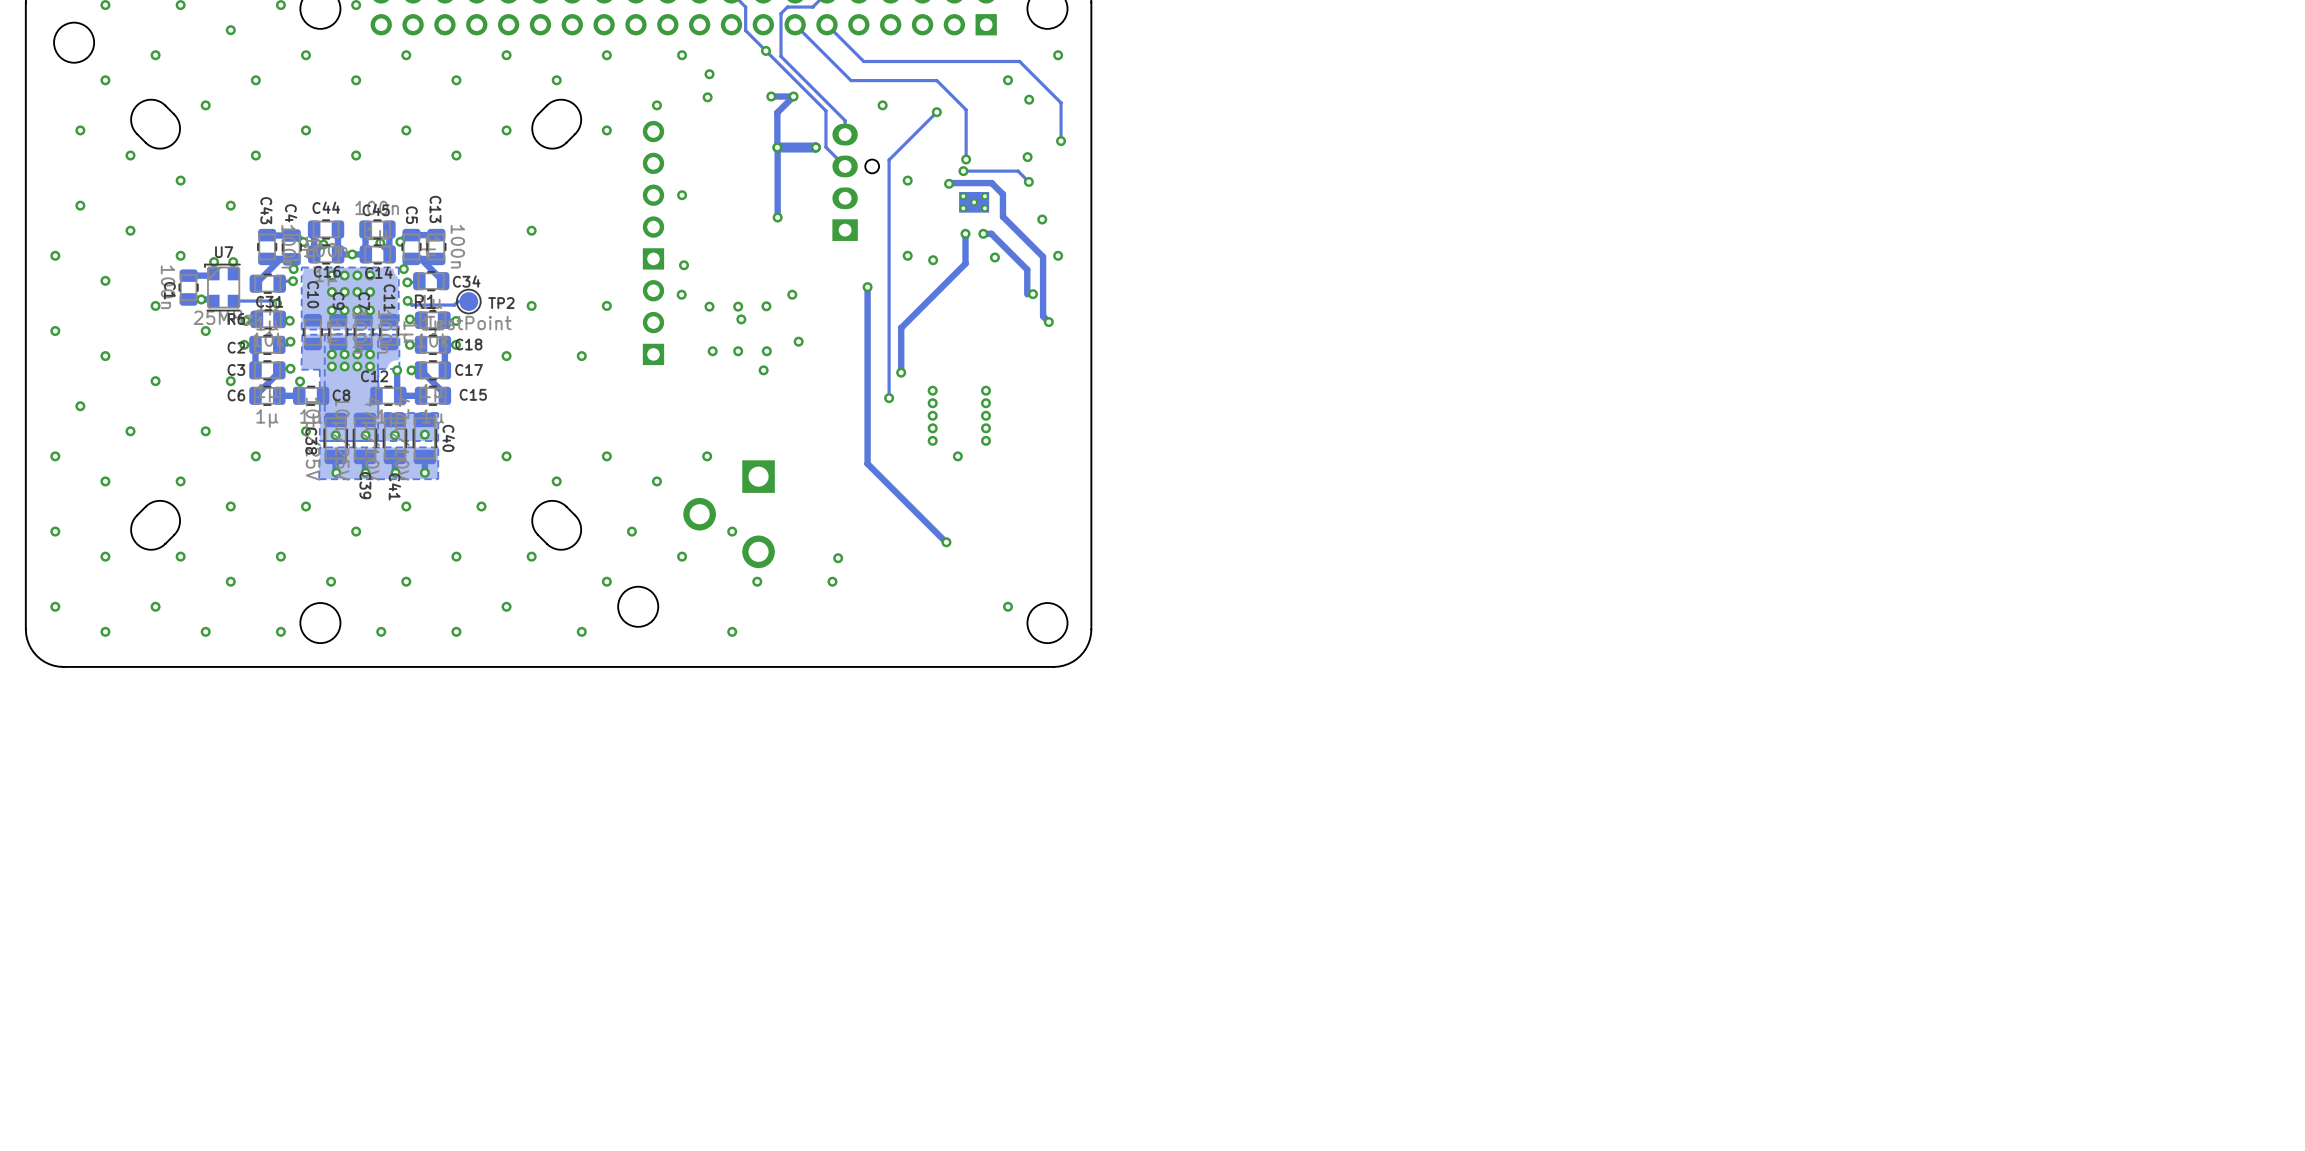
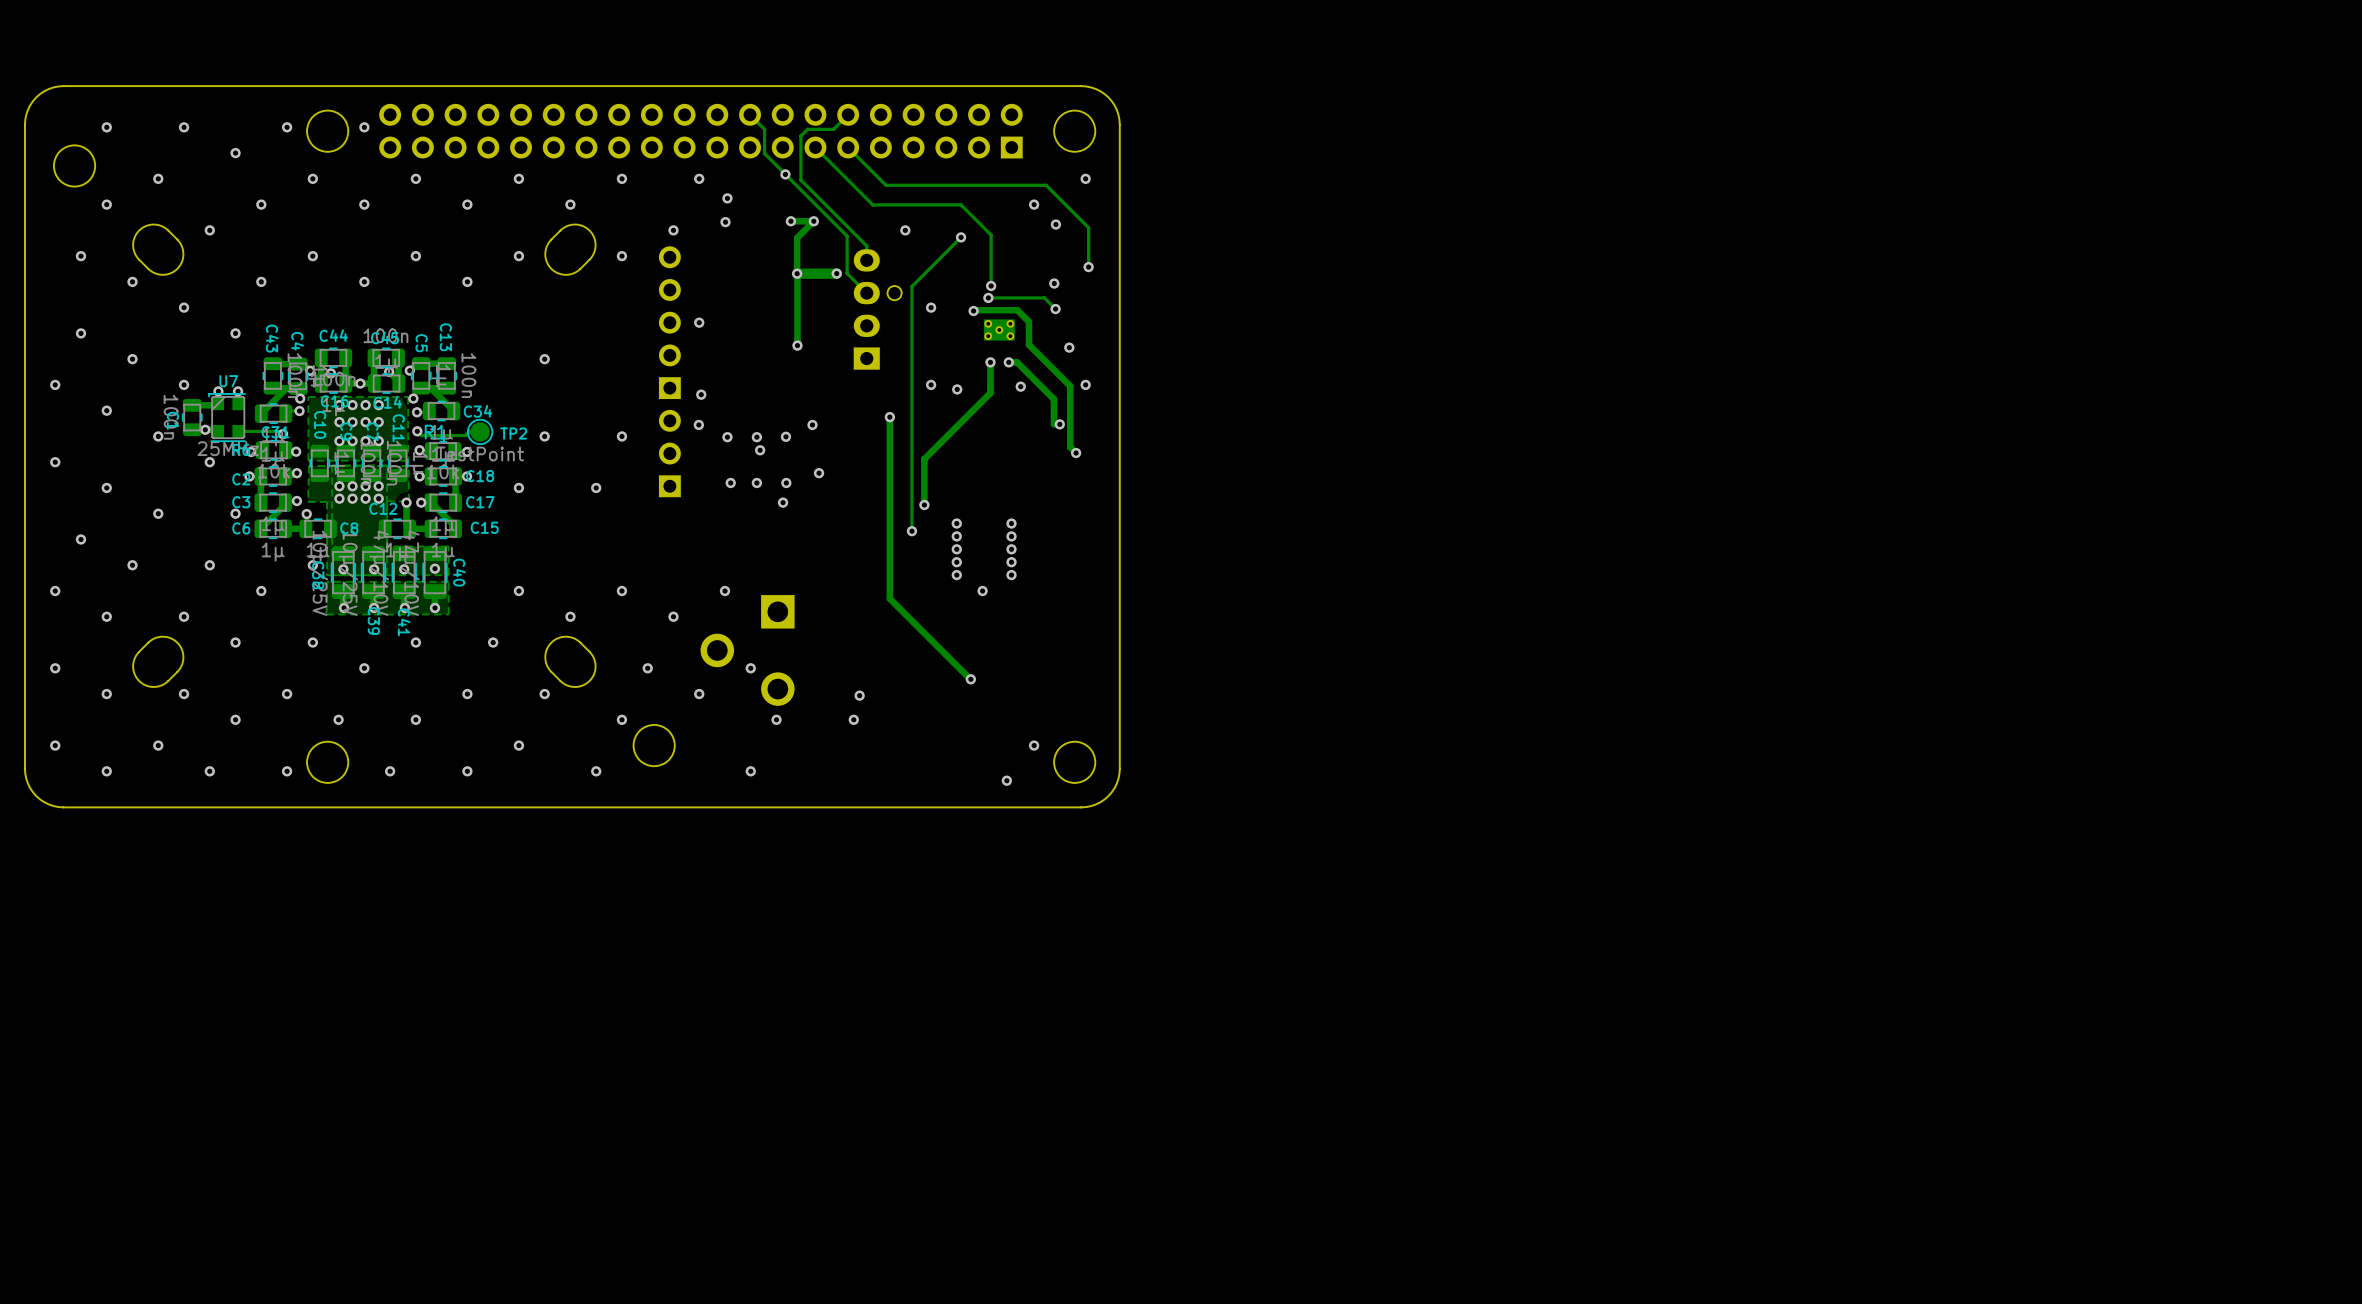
via: none -> (1006, 780)

